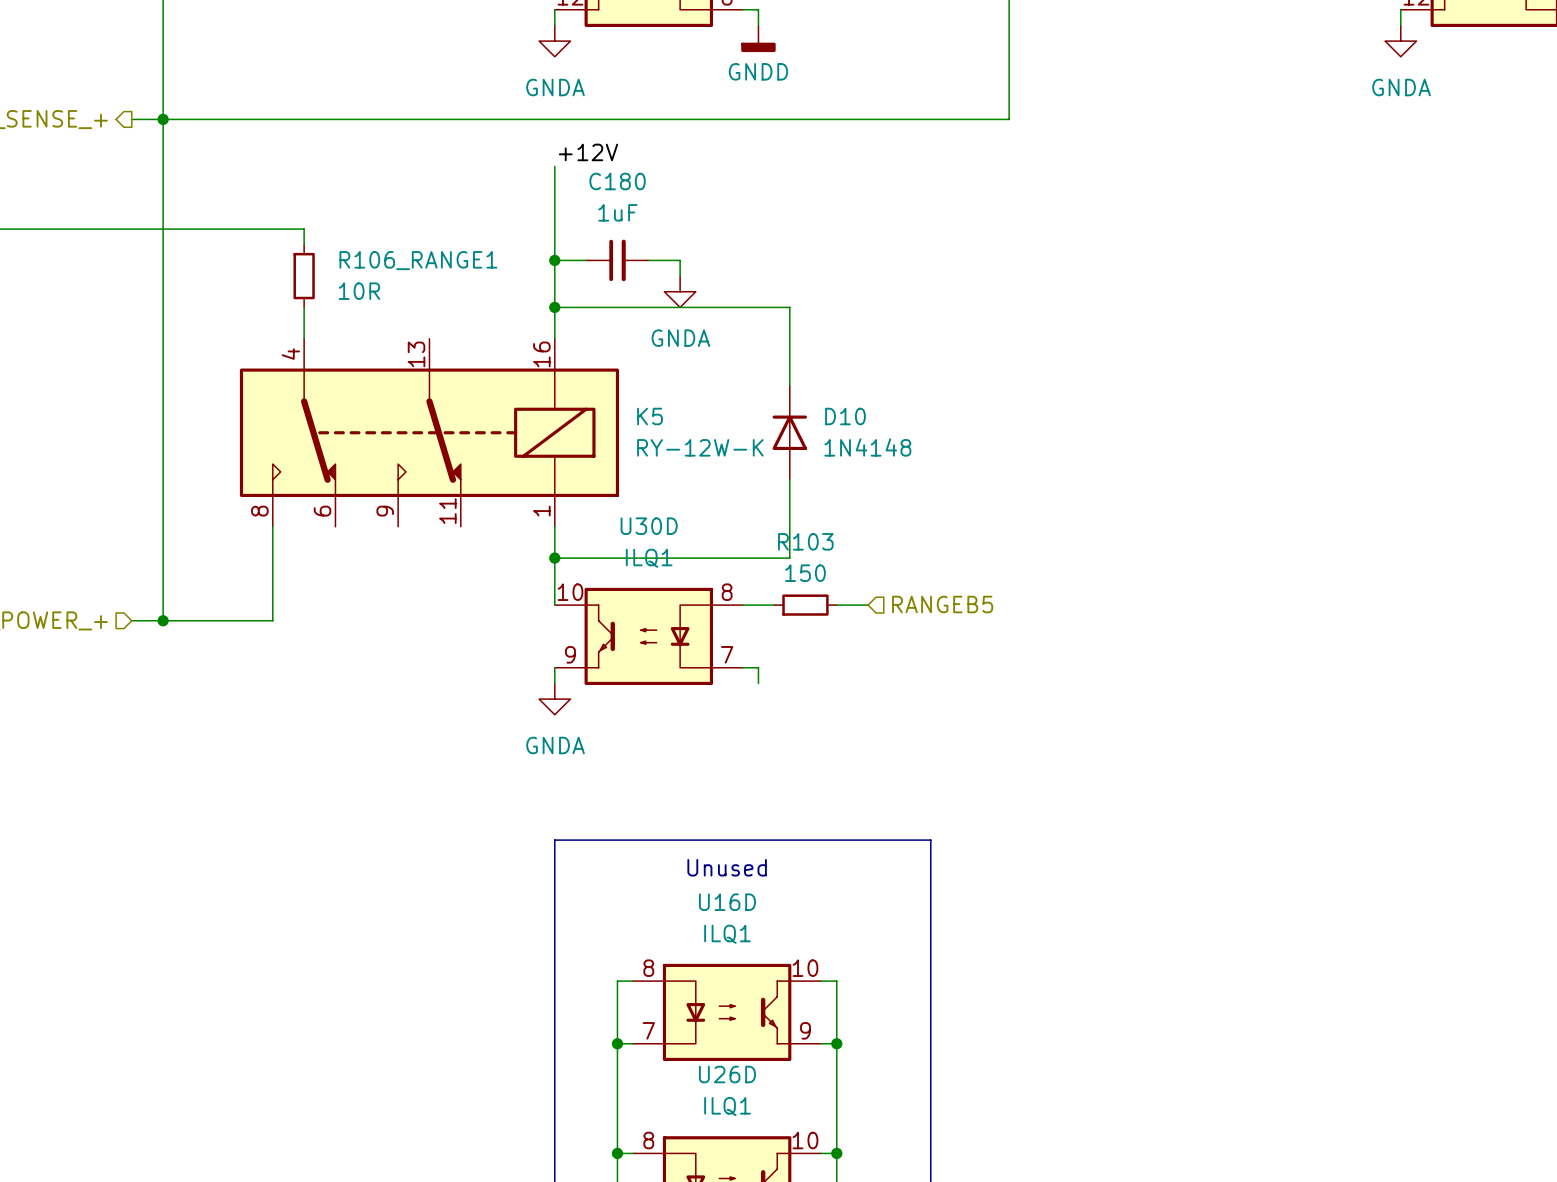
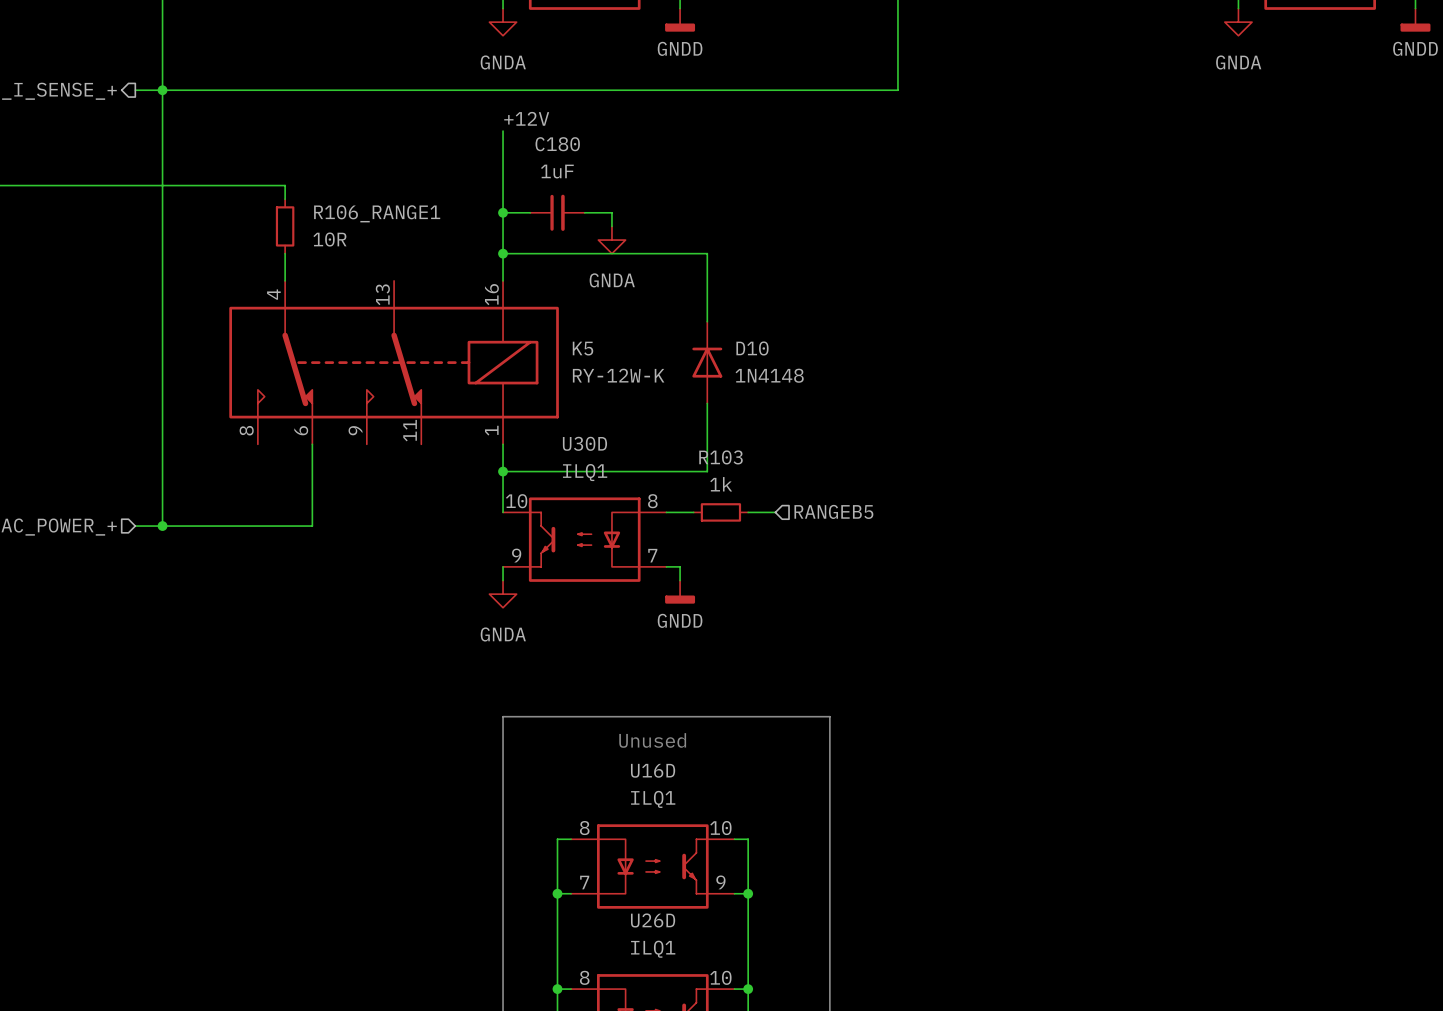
wire: (272, 526) (272, 620) -> (312, 444) (312, 526) (257, 526)
R103 value: 150 (805, 573) -> 1k (721, 484)
power symbol: none -> GNDD (680, 592)

